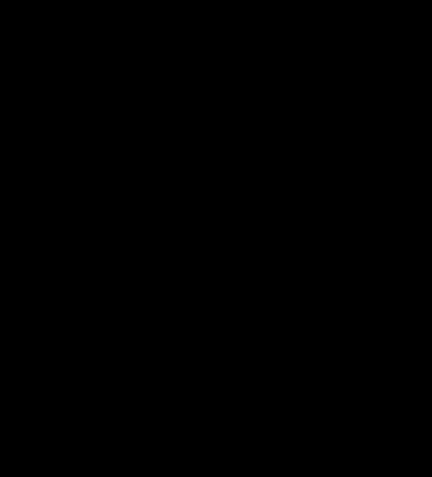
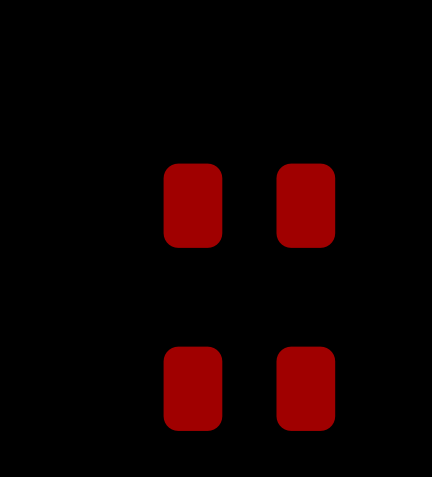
part: none -> (249, 205)
part: none -> (249, 388)

